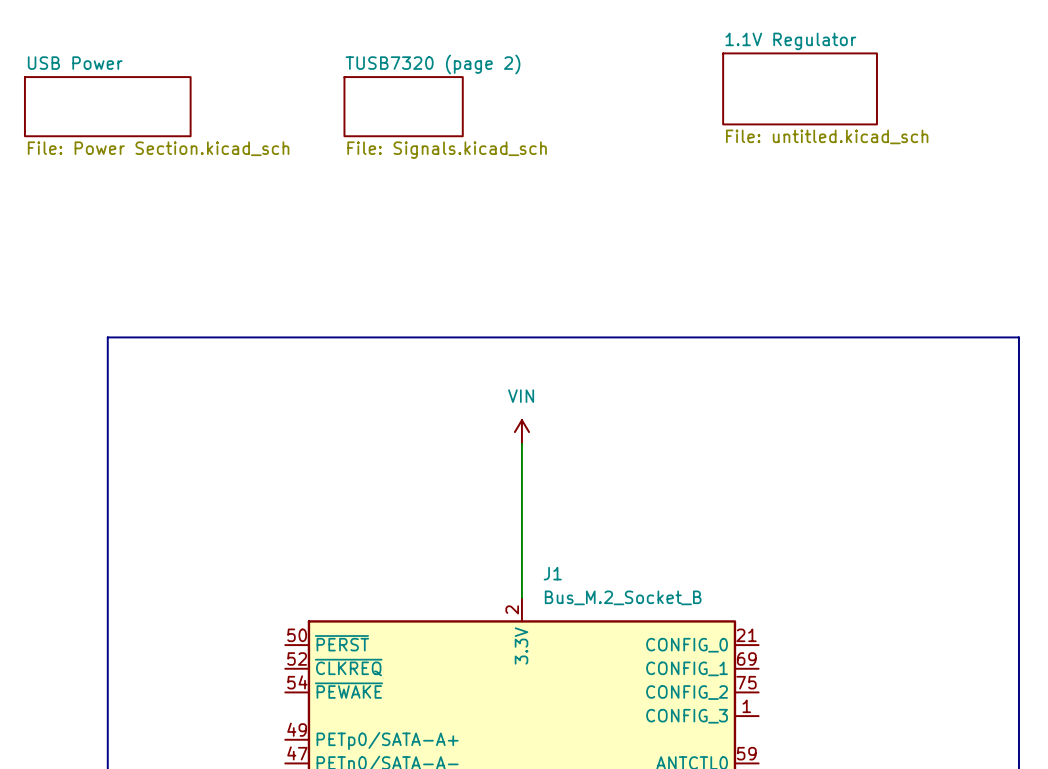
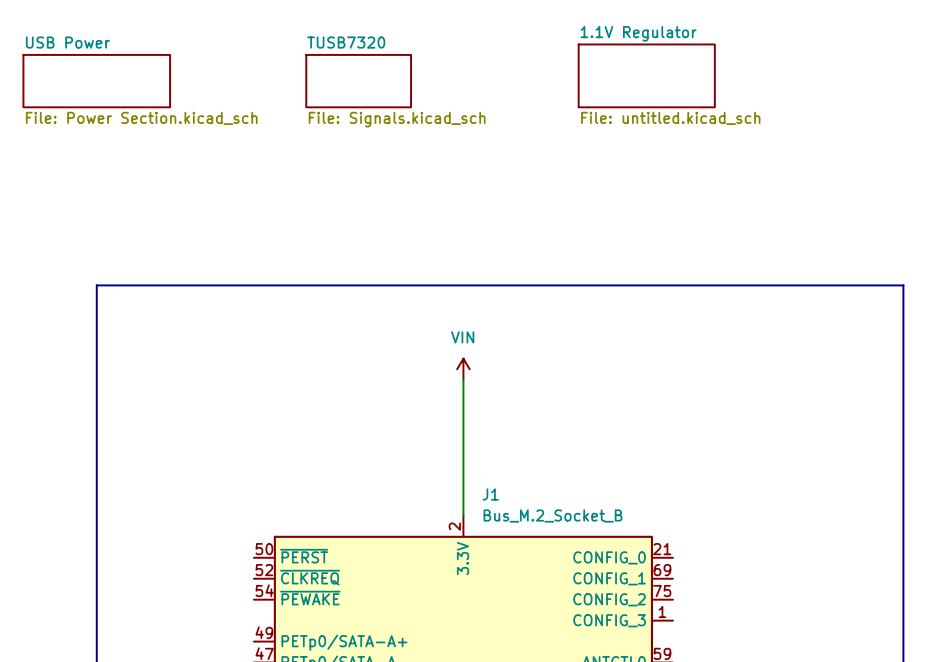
sheet TUSB7320 (page 2) name: TUSB7320 (page 2) (433, 64) -> TUSB7320 (346, 42)
sheet 1.1V Regulator position: (800, 88) -> (646, 75)

